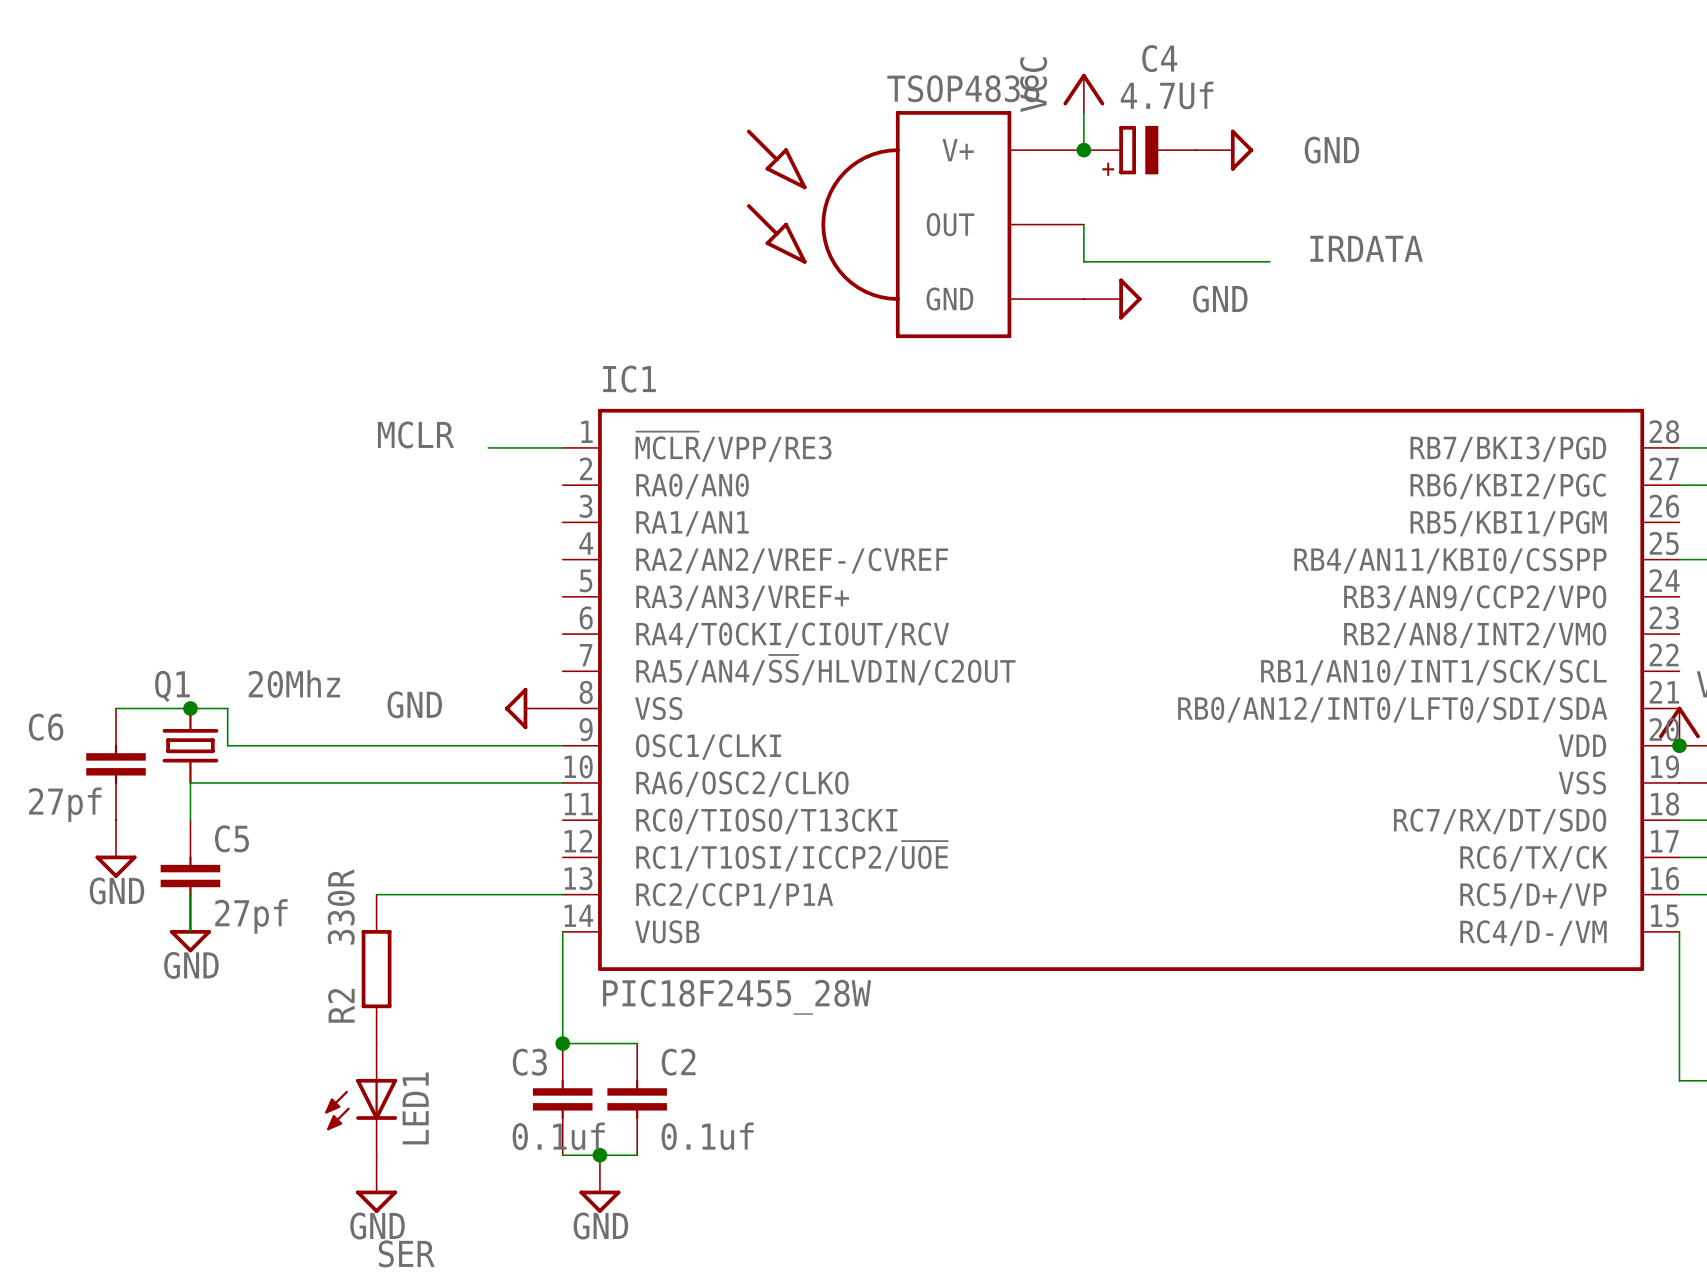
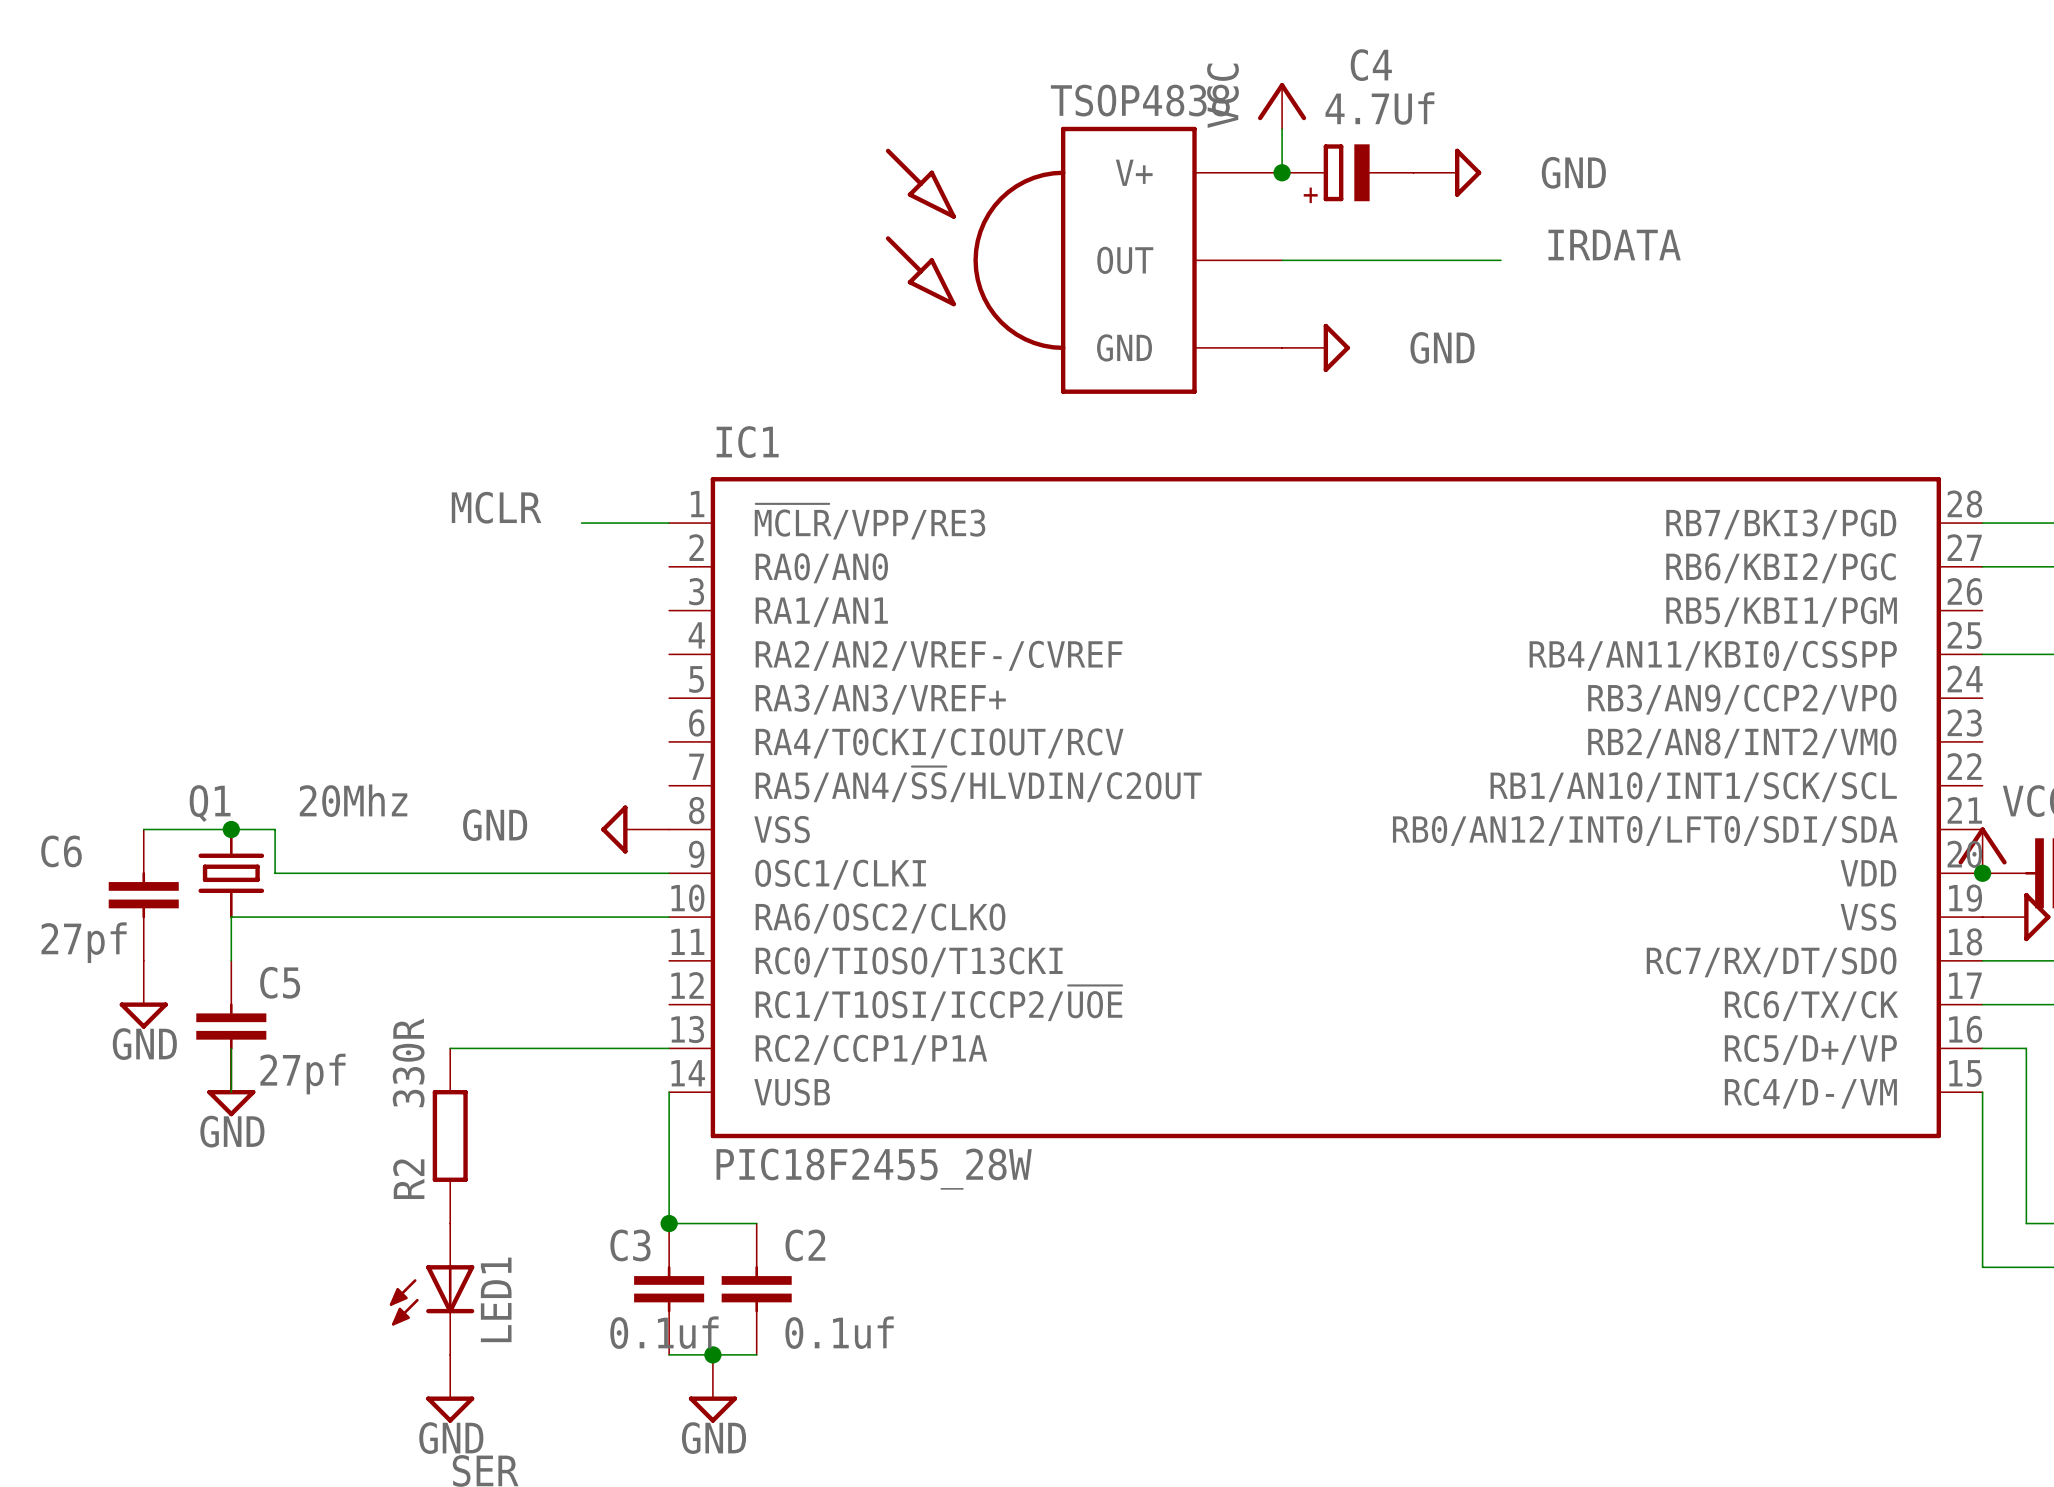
wire: (1083, 224) (1083, 261) (1270, 261) -> (1282, 260) (1500, 260)
label position: IRDATA (1366, 248) -> IRDATA (1614, 245)

